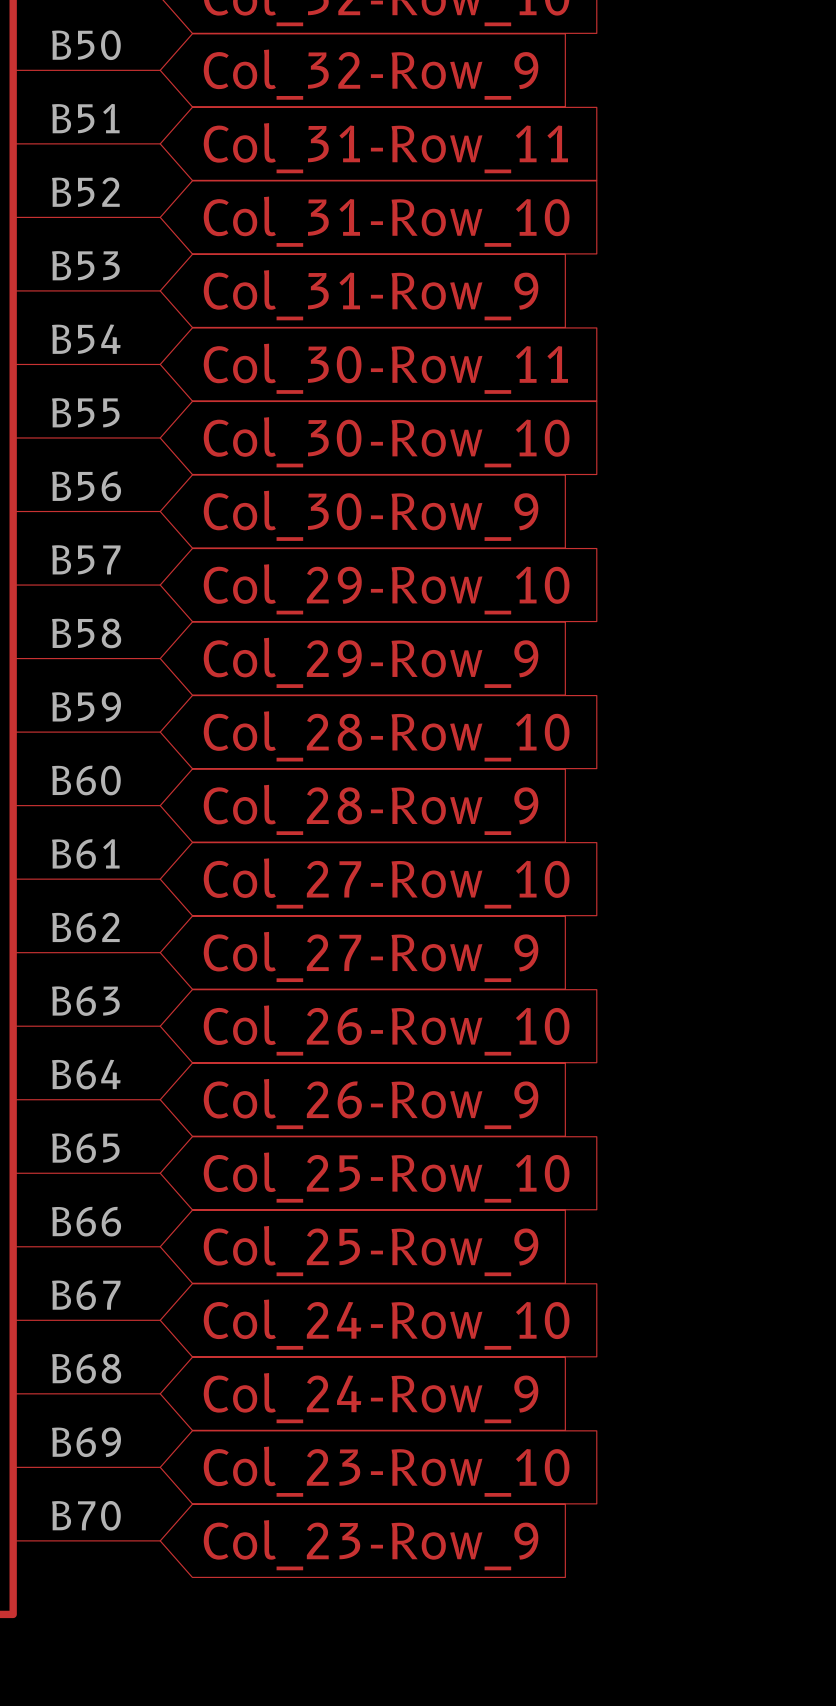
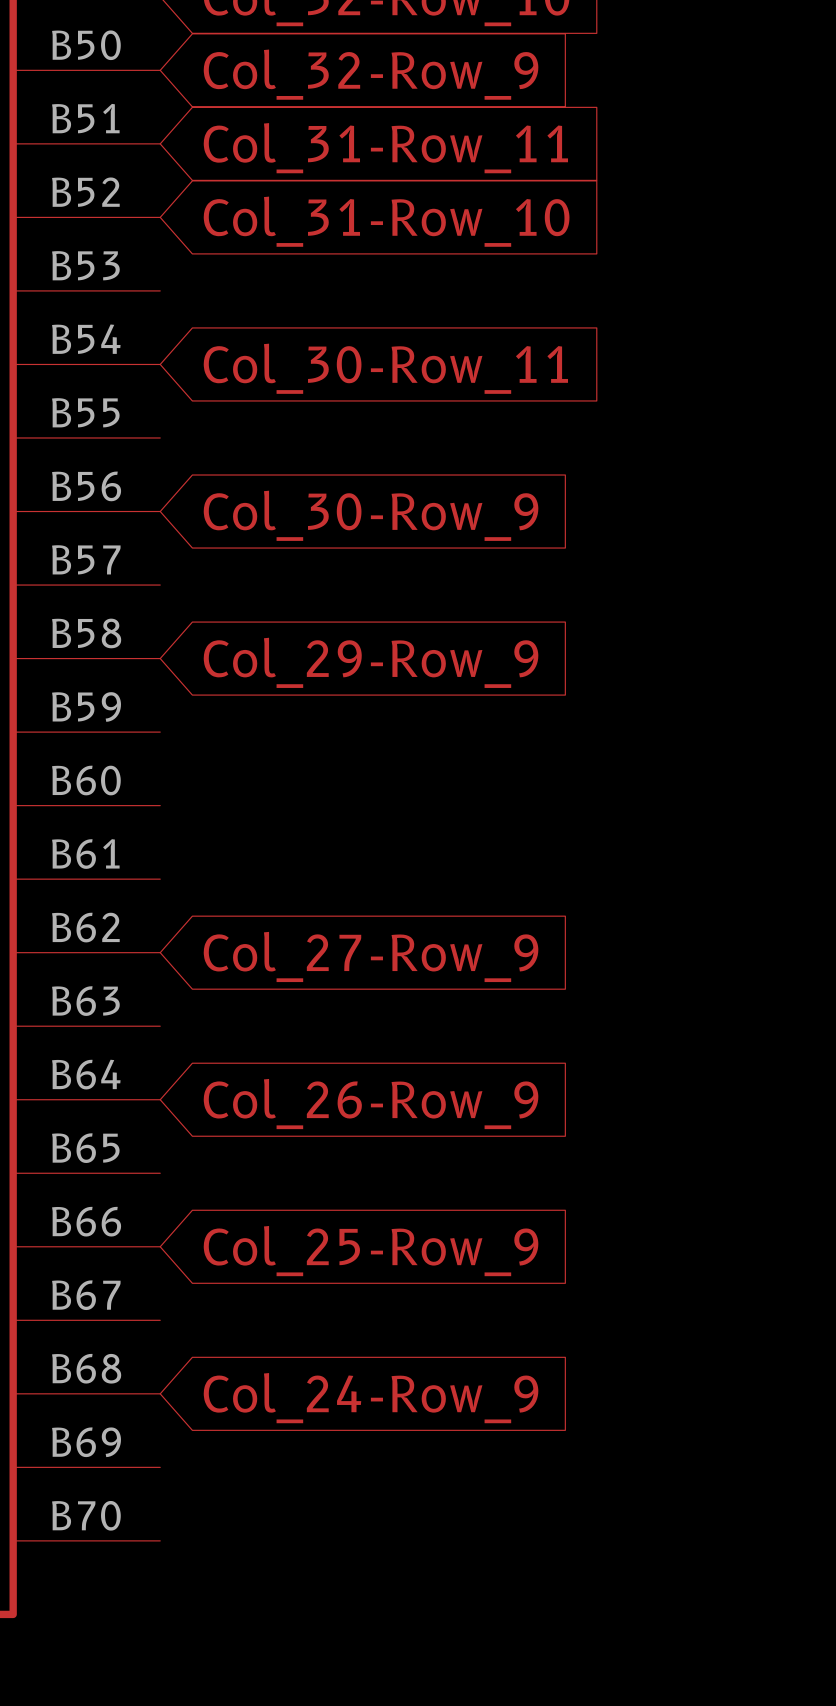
global label: Col_31-Row_9 (371, 295) -> none
global label: Col_30-Row_10 (386, 442) -> none
global label: Col_29-Row_10 (386, 589) -> none
global label: Col_28-Row_10 (386, 736) -> none
global label: Col_28-Row_9 (371, 809) -> none
global label: Col_27-Row_10 (386, 883) -> none
global label: Col_26-Row_10 (386, 1030) -> none
global label: Col_25-Row_10 (386, 1177) -> none
global label: Col_24-Row_10 (386, 1324) -> none
global label: Col_23-Row_10 (386, 1471) -> none
global label: Col_23-Row_9 (371, 1545) -> none

